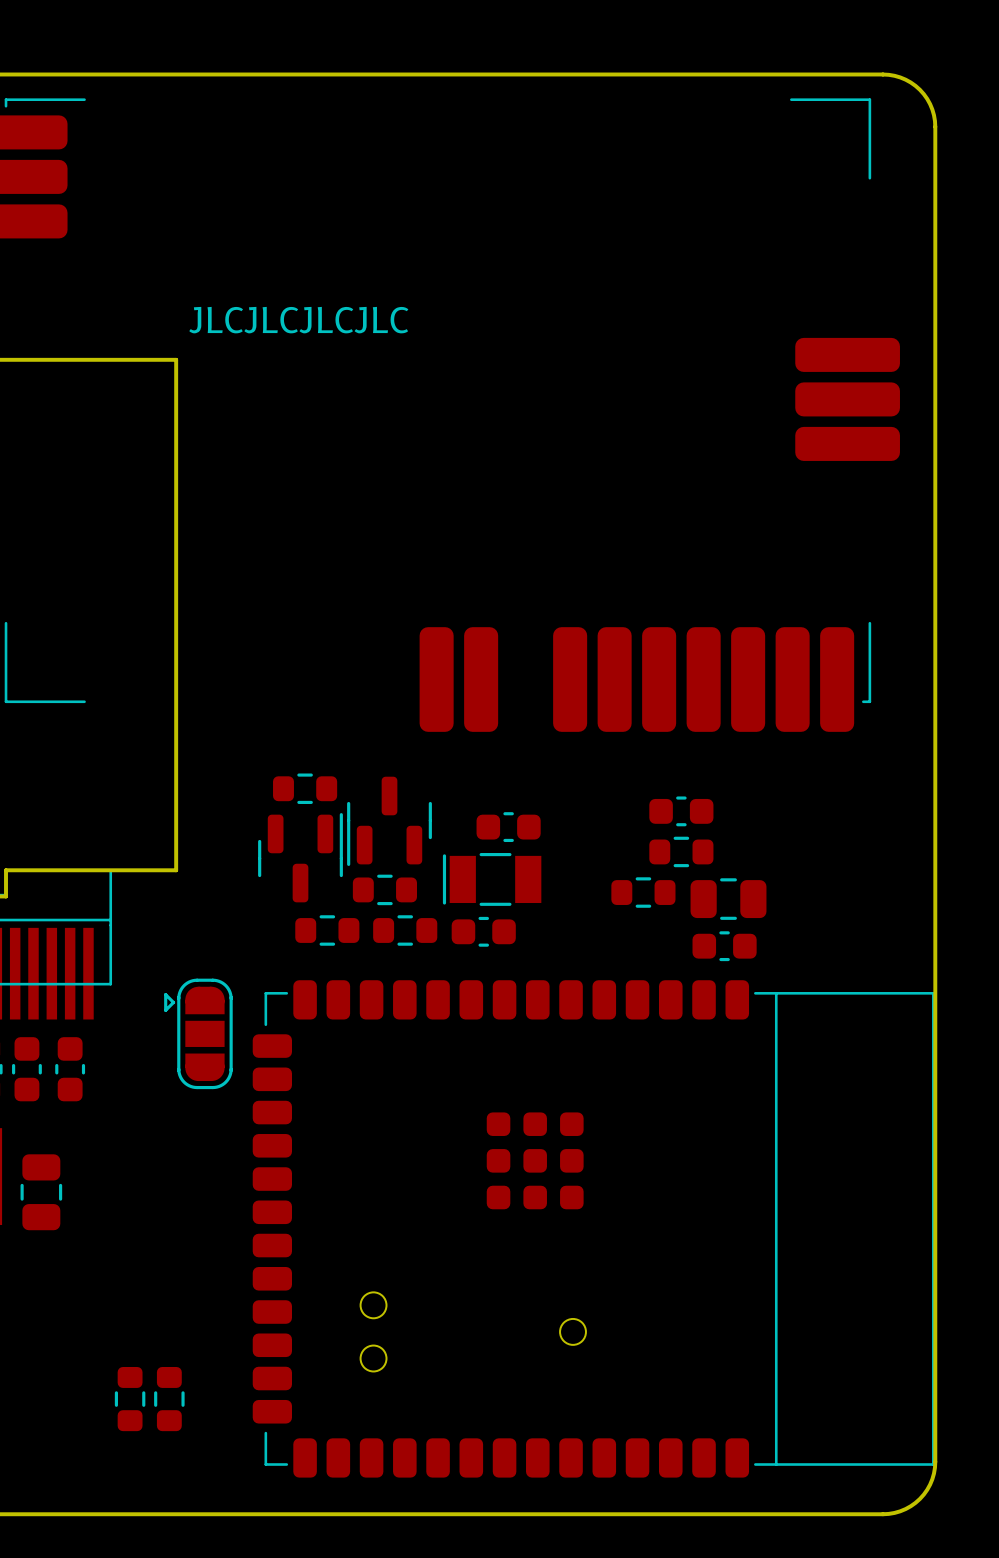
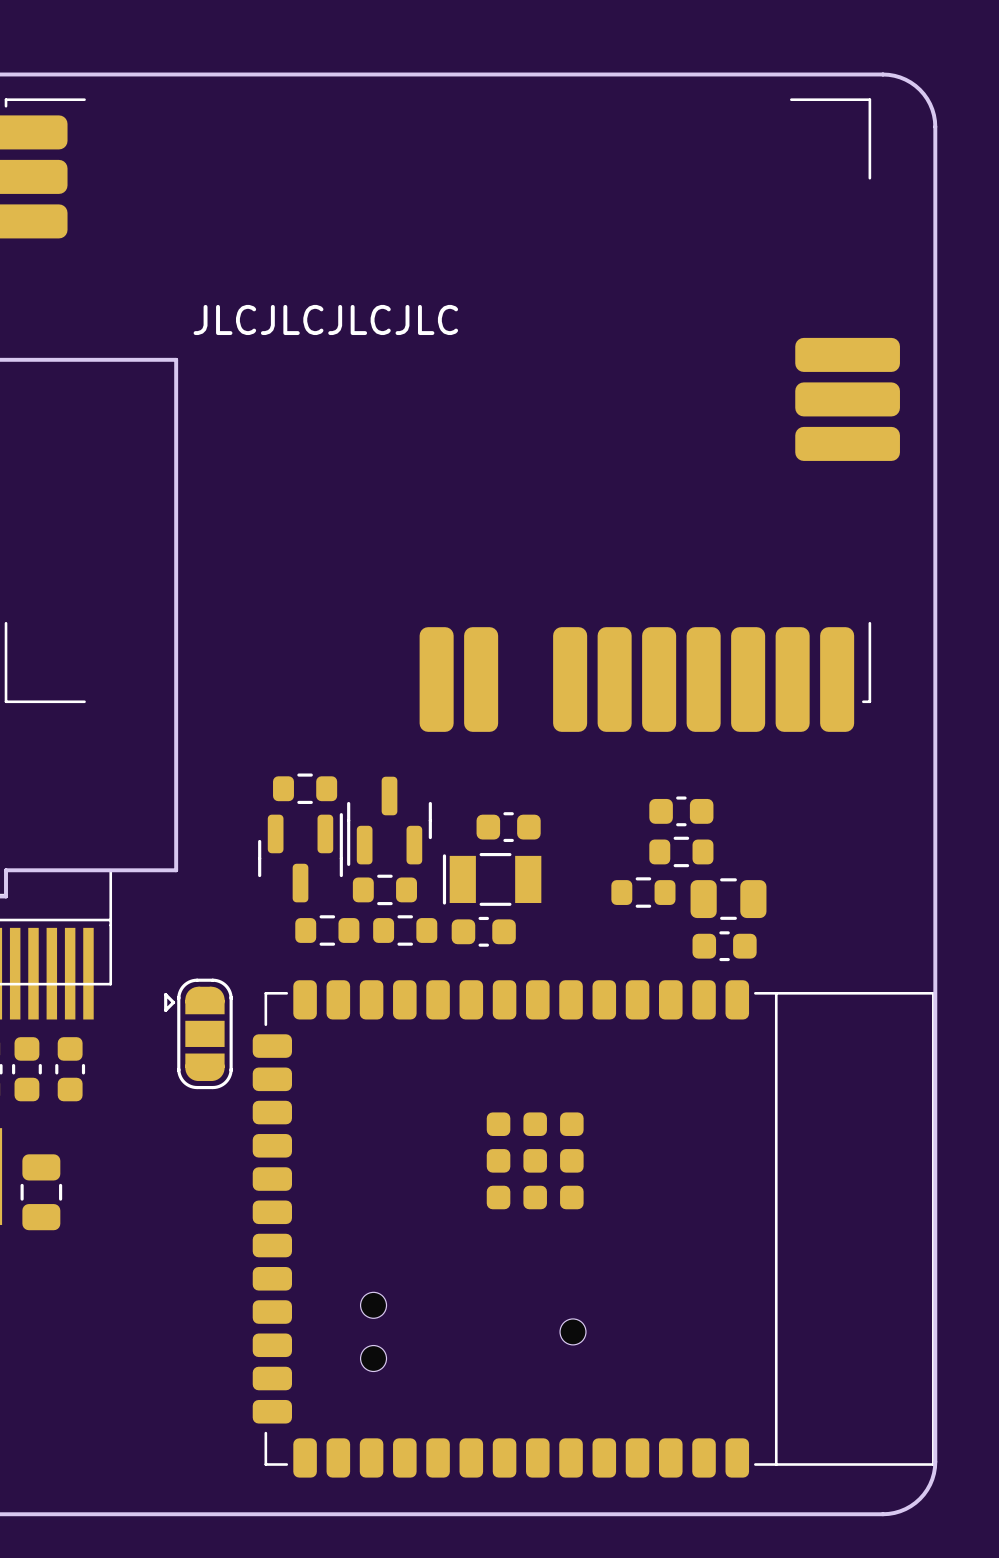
part: (130, 1399) -> none
part: (169, 1399) -> none

